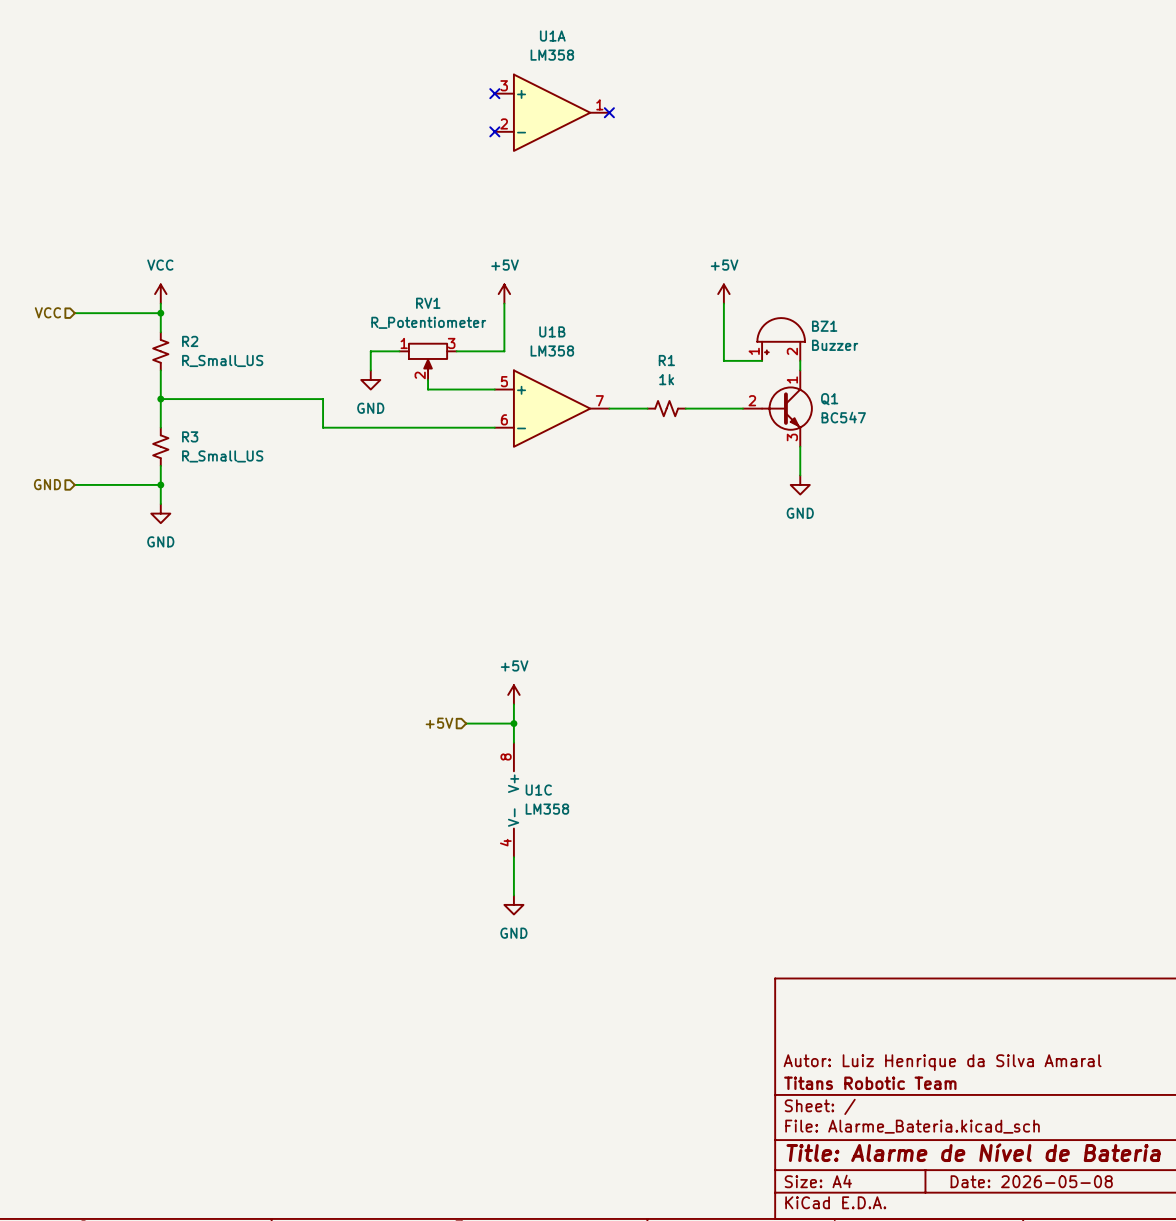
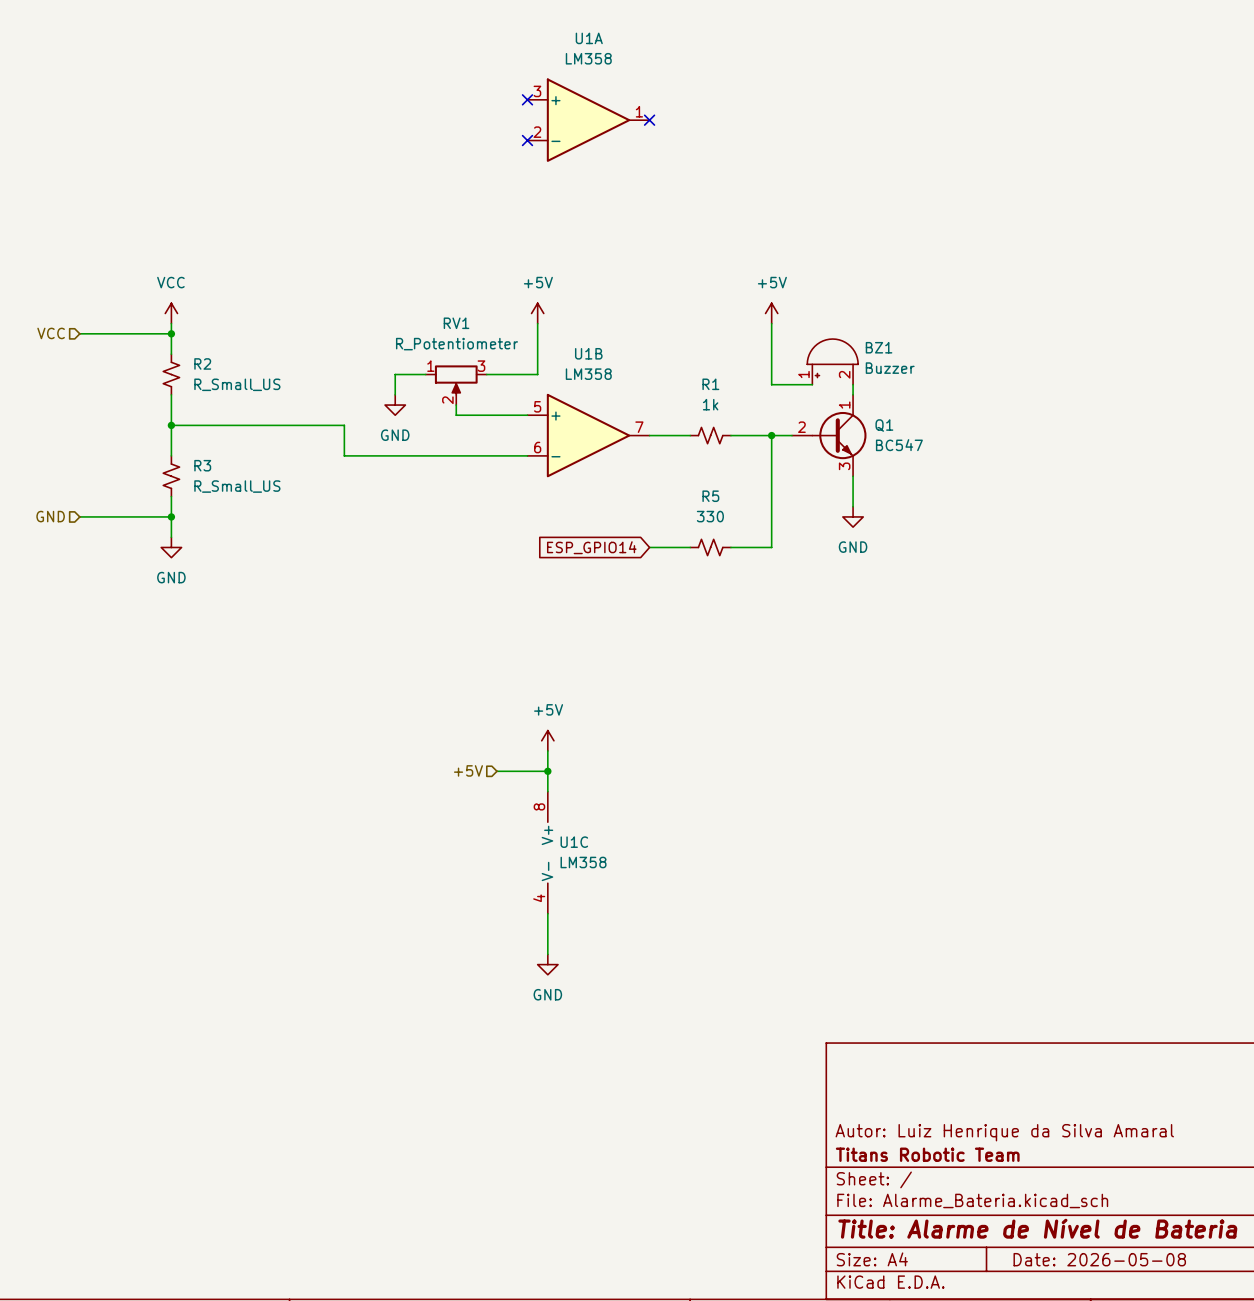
wire: none -> (771, 435) (771, 547) (730, 547)
junction: none -> (771, 435)
global label: none -> ESP_GPIO14 (591, 547)
wire: none -> (649, 547) (690, 547)
R5: none -> 330 (710, 547)

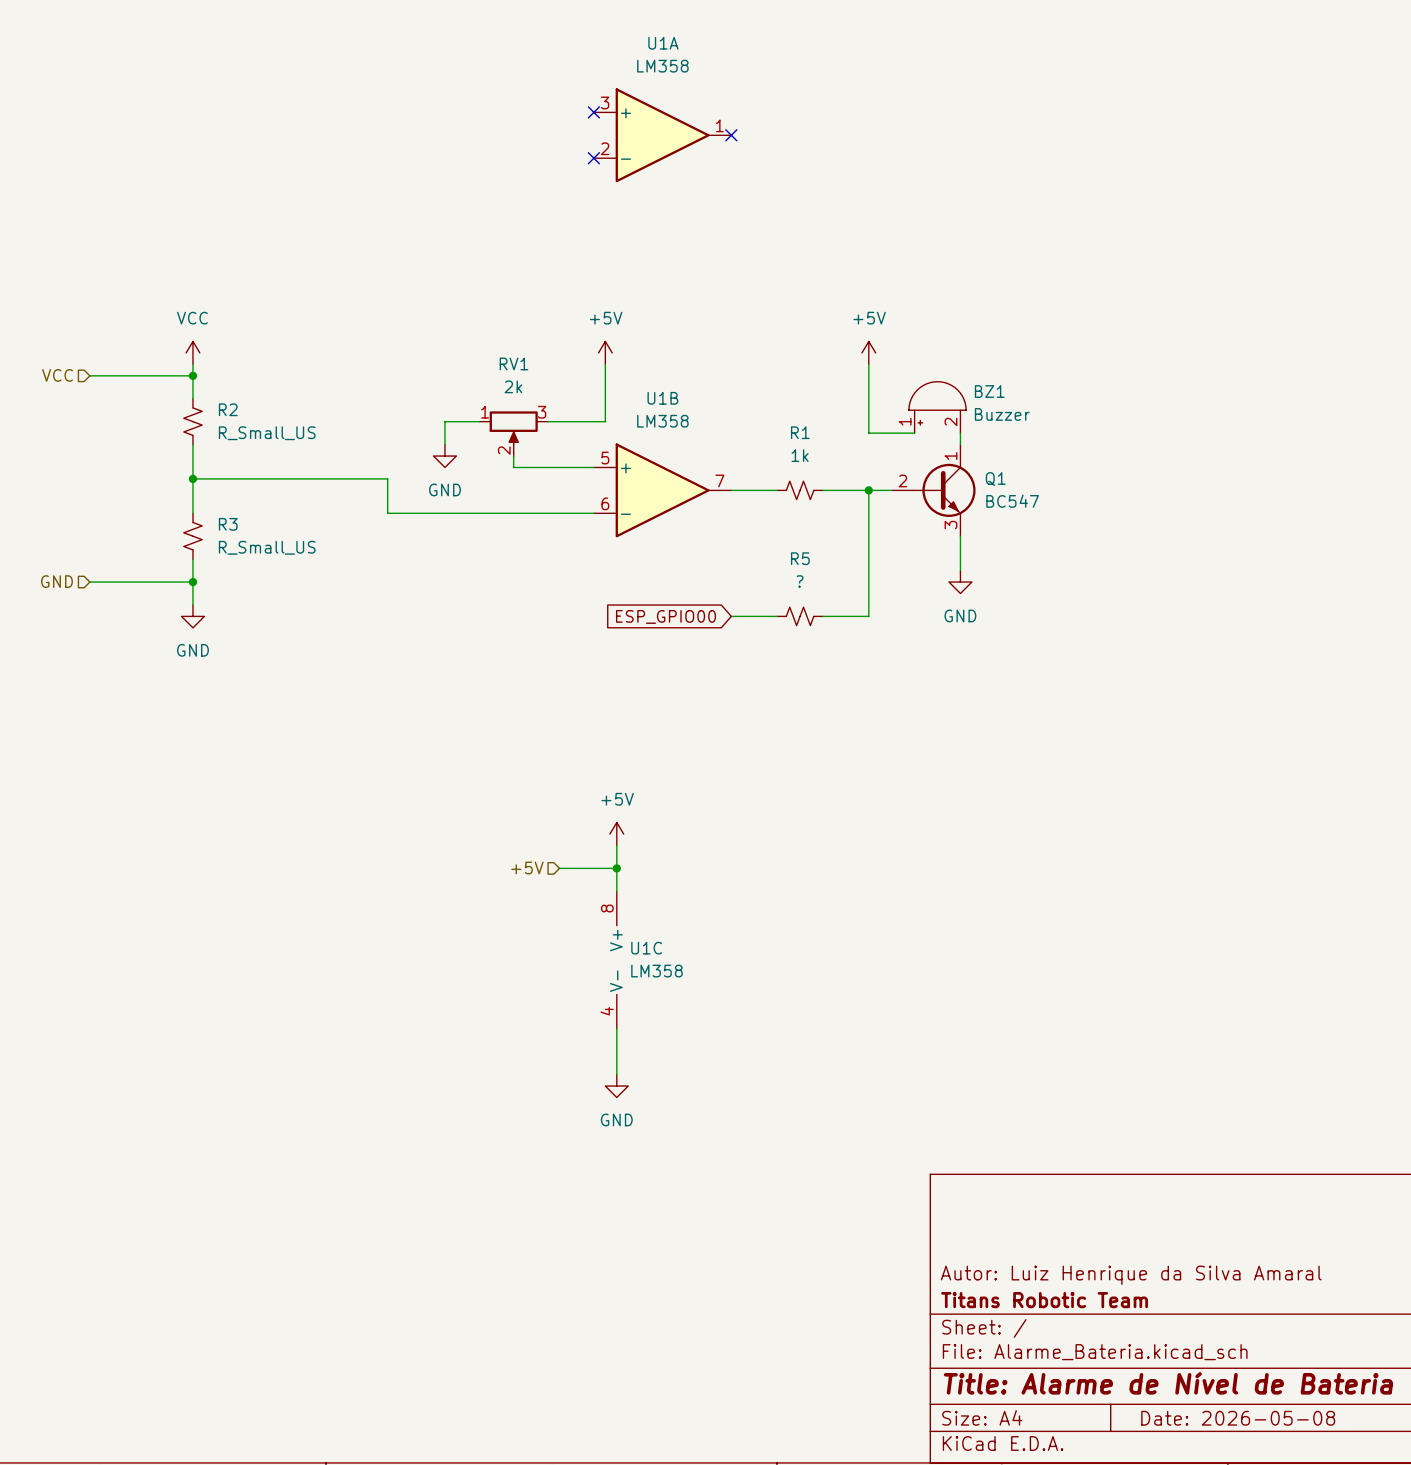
RV1 value: R_Potentiometer (457, 344) -> 2k (513, 386)
R5 value: 330 (710, 516) -> ? (800, 581)
global label: ESP_GPIO14 (591, 547) -> ESP_GPIO00 (666, 616)

